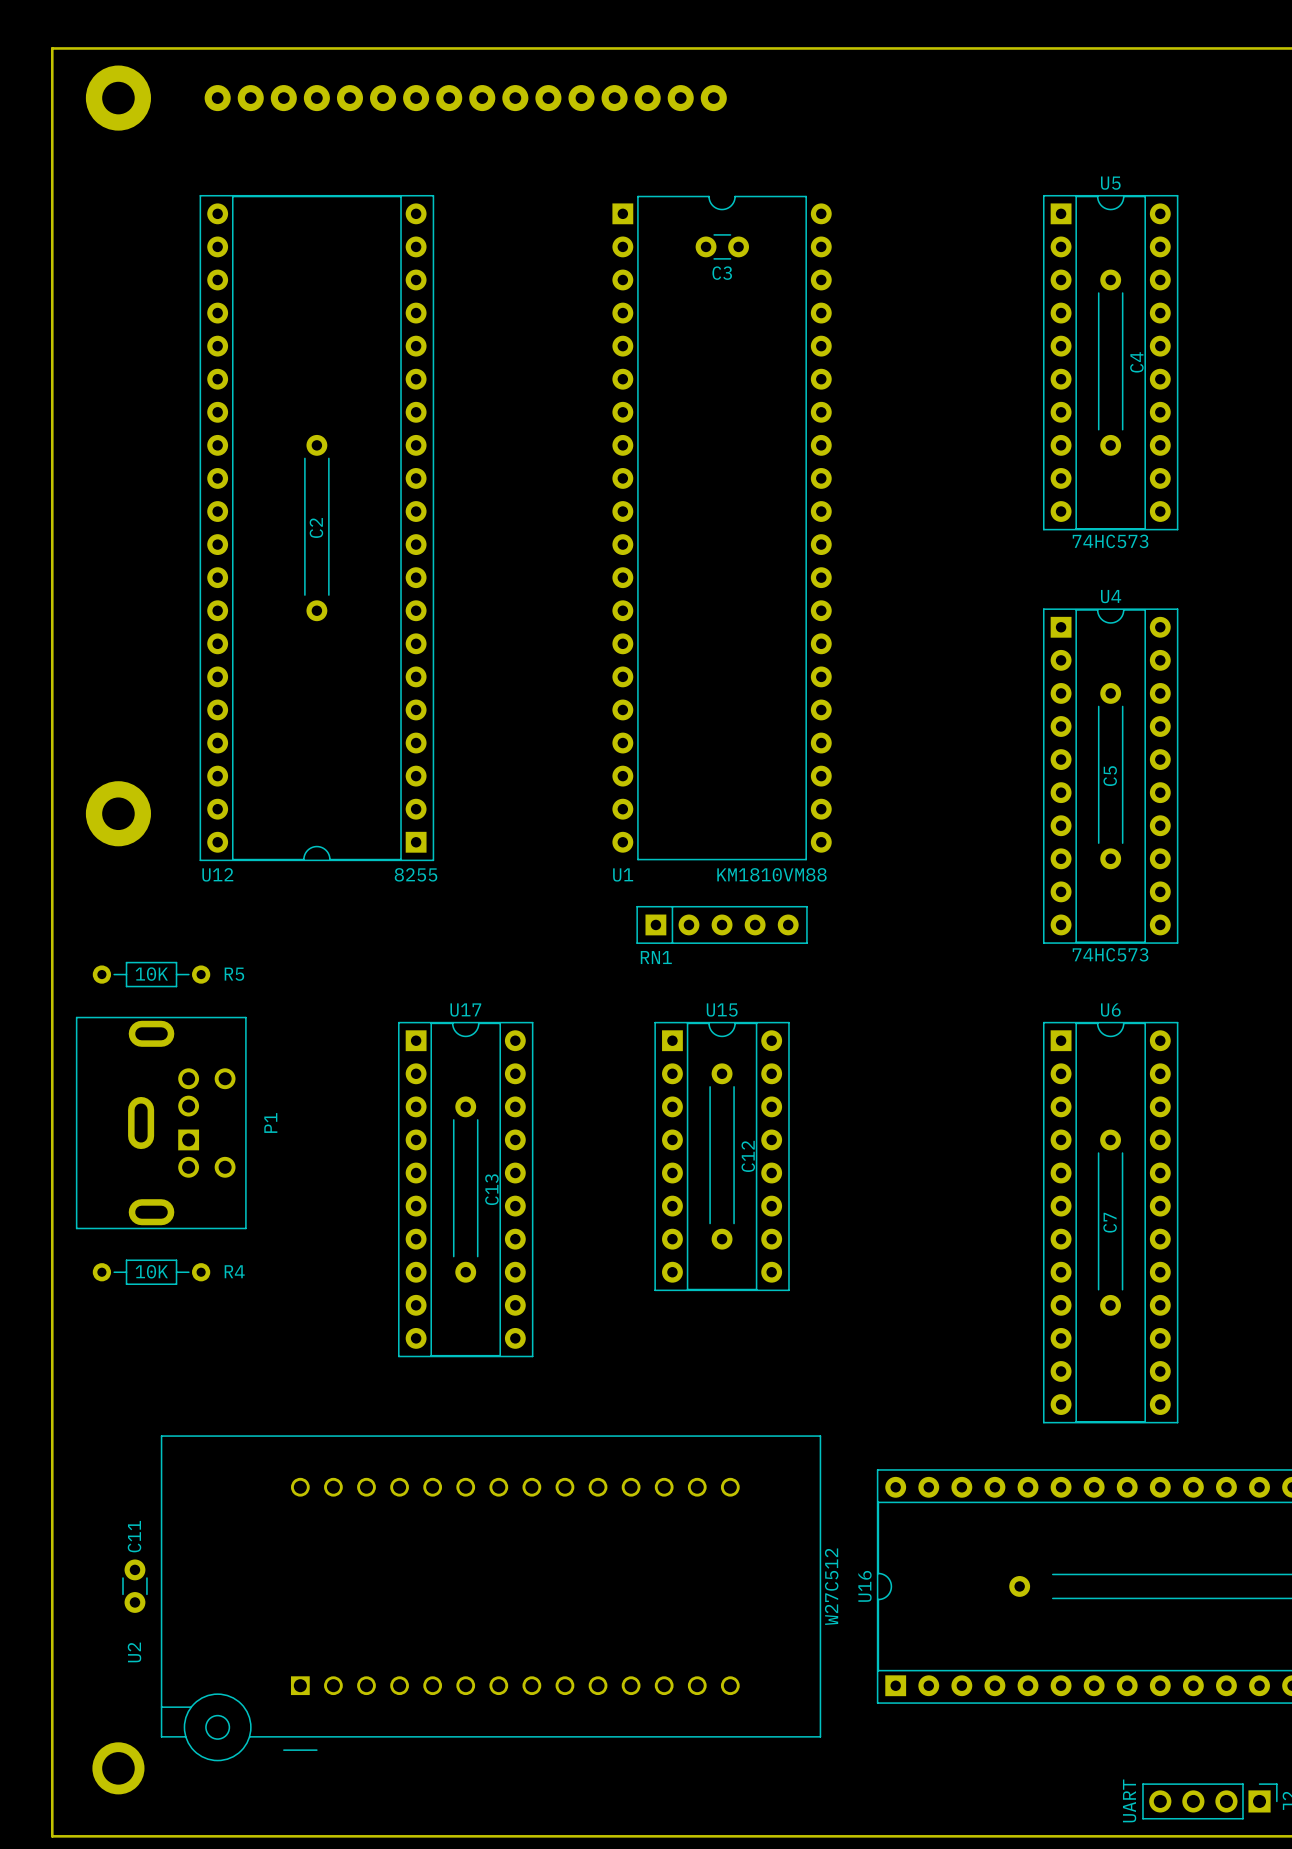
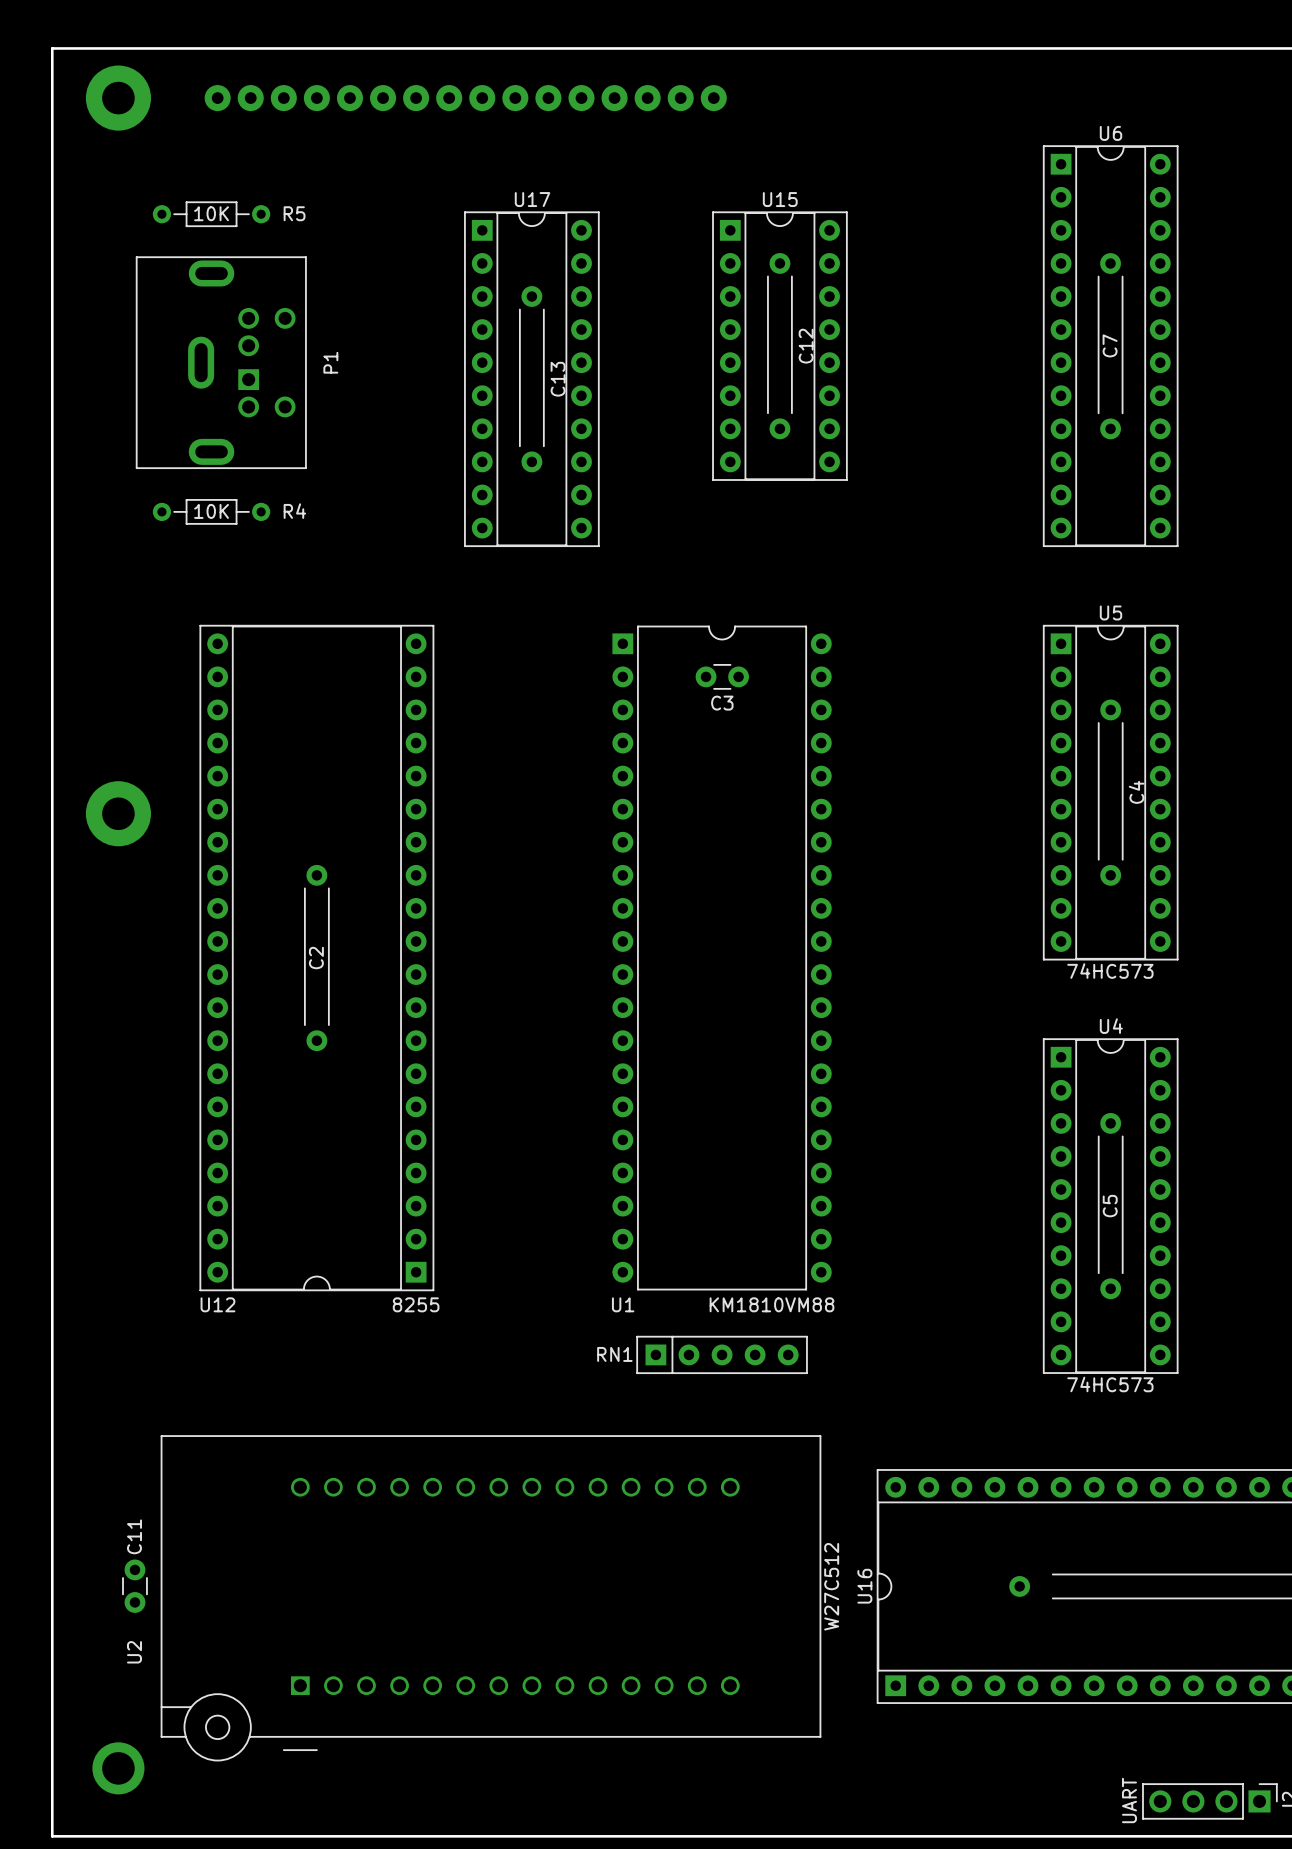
C3 position: (722, 246) -> (722, 676)
C4 position: (1110, 362) -> (1110, 792)
U5 position: (1110, 362) -> (1110, 792)
C2 position: (316, 528) -> (316, 958)
U12 position: (316, 528) -> (316, 958)
U1 position: (722, 528) -> (722, 958)
U4 position: (1110, 776) -> (1110, 1206)
C5 position: (1110, 776) -> (1110, 1206)
RN1 position: (722, 924) -> (722, 1354)
RN1 name position: RN1 (656, 957) -> RN1 (614, 1354)
R5 position: (151, 974) -> (211, 214)
P1 position: (161, 1123) -> (221, 362)
C12 position: (722, 1156) -> (779, 346)
U15 position: (722, 1156) -> (779, 346)
U17 position: (465, 1189) -> (531, 379)
C13 position: (465, 1189) -> (531, 379)
C7 position: (1110, 1222) -> (1110, 346)
U6 position: (1110, 1222) -> (1110, 346)
R4 position: (151, 1272) -> (211, 511)

